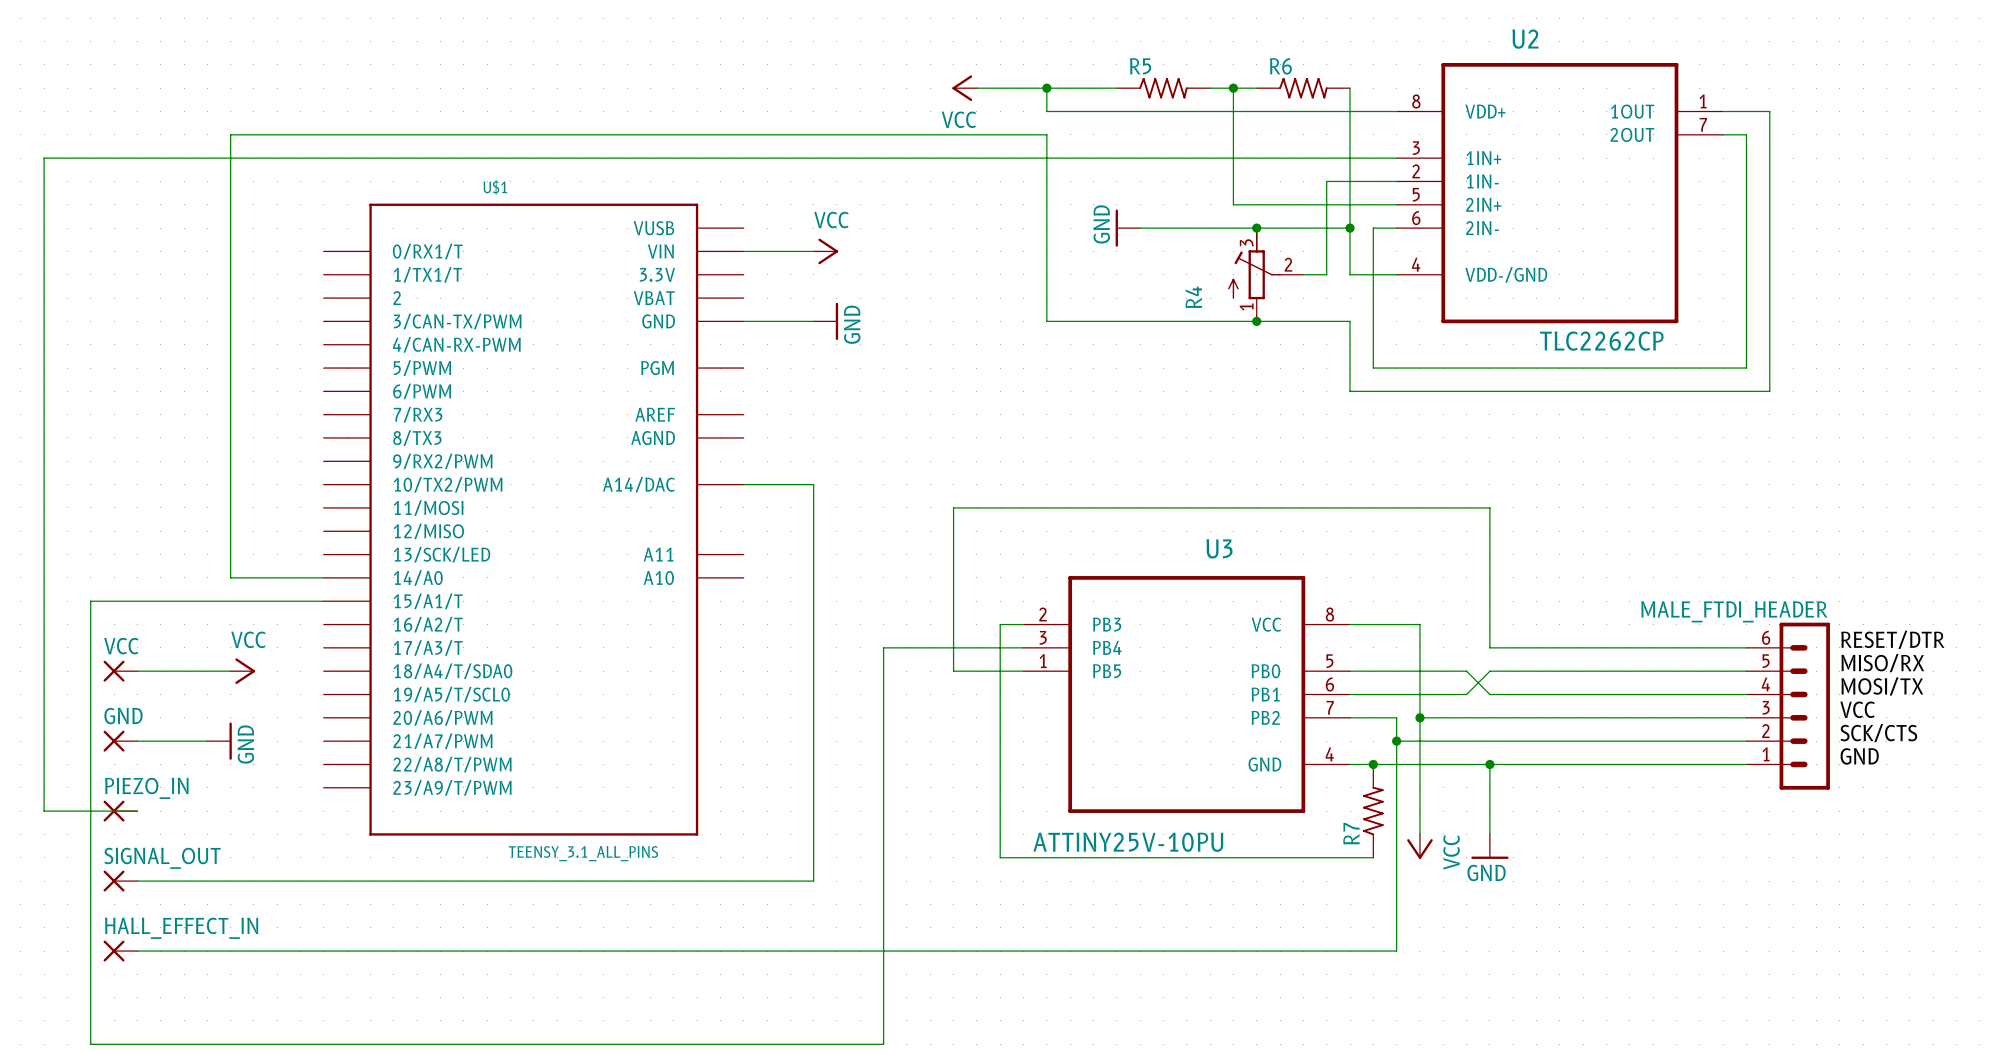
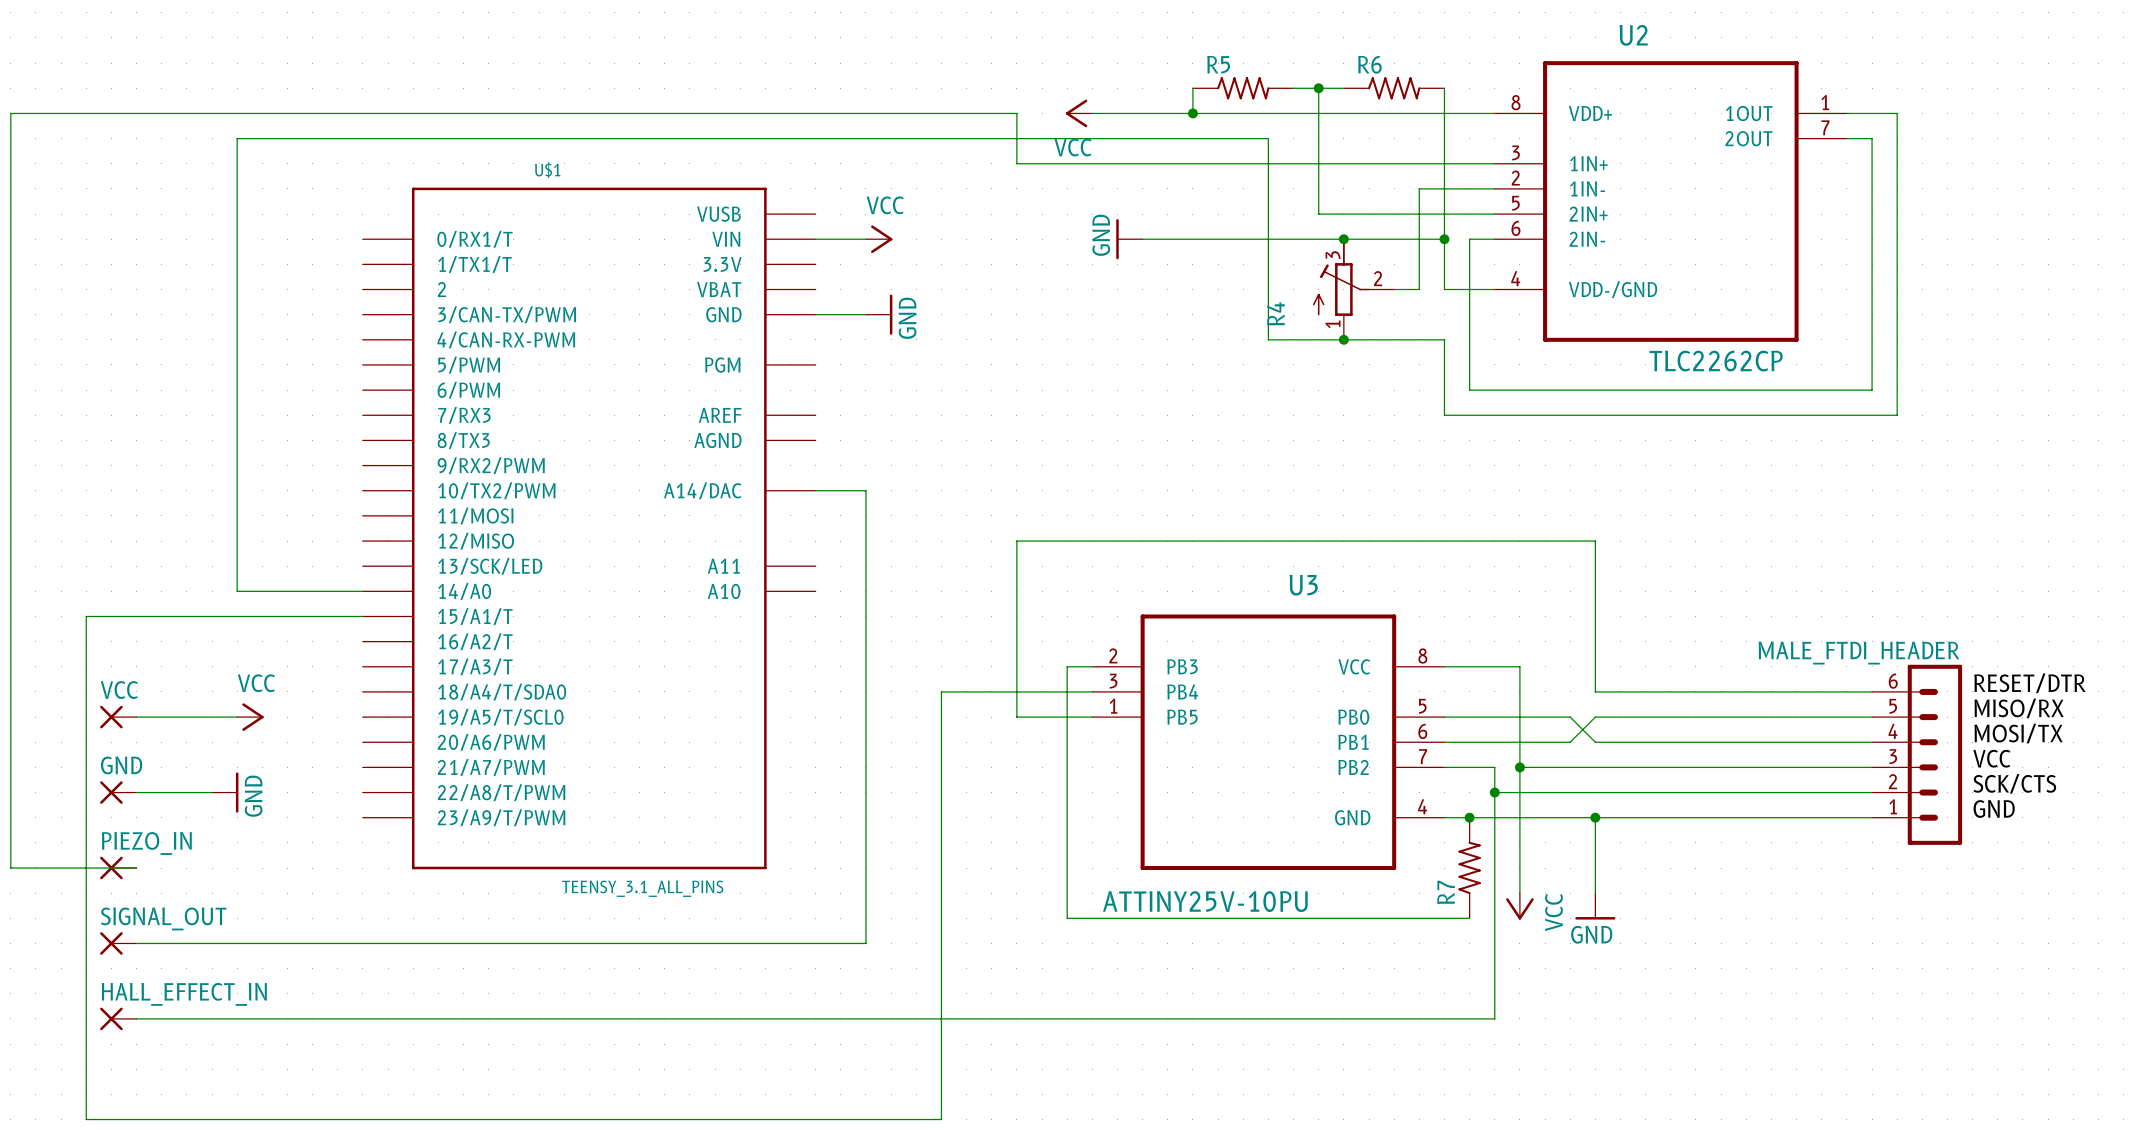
power symbol position: VCC (964, 88) -> VCC (1079, 113)
wire: (976, 88) (1116, 88) -> (1192, 113) (1192, 88)
wire: (1046, 88) (1046, 111) -> (1092, 113) (1117, 113)
junction: (1046, 88) -> none
junction: none -> (1192, 113)
wire: (1046, 134) (1046, 321) (1186, 321) -> (1117, 138) (1268, 138) (1268, 339)
wire: (953, 158) (44, 158) (44, 811) -> (1016, 163) (1016, 113) (10, 113) (10, 868) (35, 868)
wire: none -> (815, 239) (865, 239)
wire: none -> (1142, 239) (1218, 239)
power symbol position: GND (1127, 228) -> GND (1129, 239)
wire: (743, 251) (813, 251) -> none
power symbol position: VCC (825, 251) -> VCC (879, 239)
wire: none -> (815, 314) (865, 314)
wire: (743, 321) (813, 321) -> none
power symbol position: GND (825, 321) -> GND (879, 314)
wire: (743, 484) (813, 484) -> (815, 490) (865, 490) (865, 515)
U$1 position: (533, 519) -> (589, 528)
wire: (230, 554) (230, 577) -> (237, 591) (362, 591)
wire: (90, 601) (323, 601) -> (86, 641) (86, 616) (237, 616)

